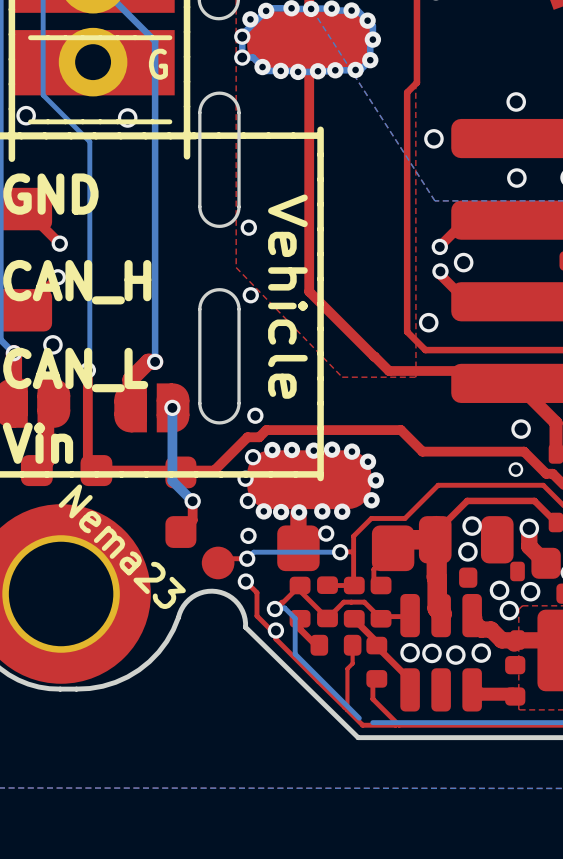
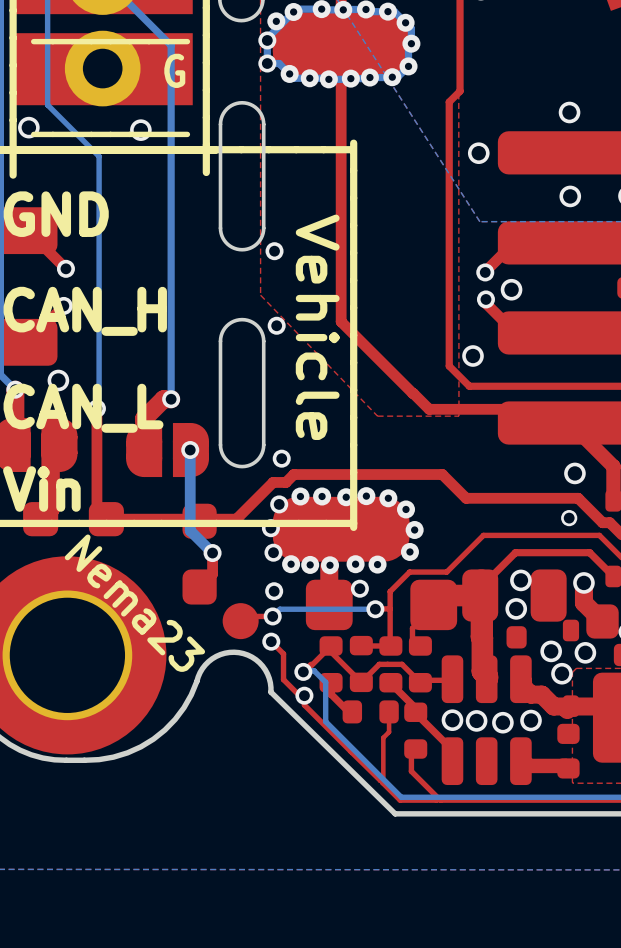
bottom track: none -> (396, 792) (401, 797) (411, 797)

